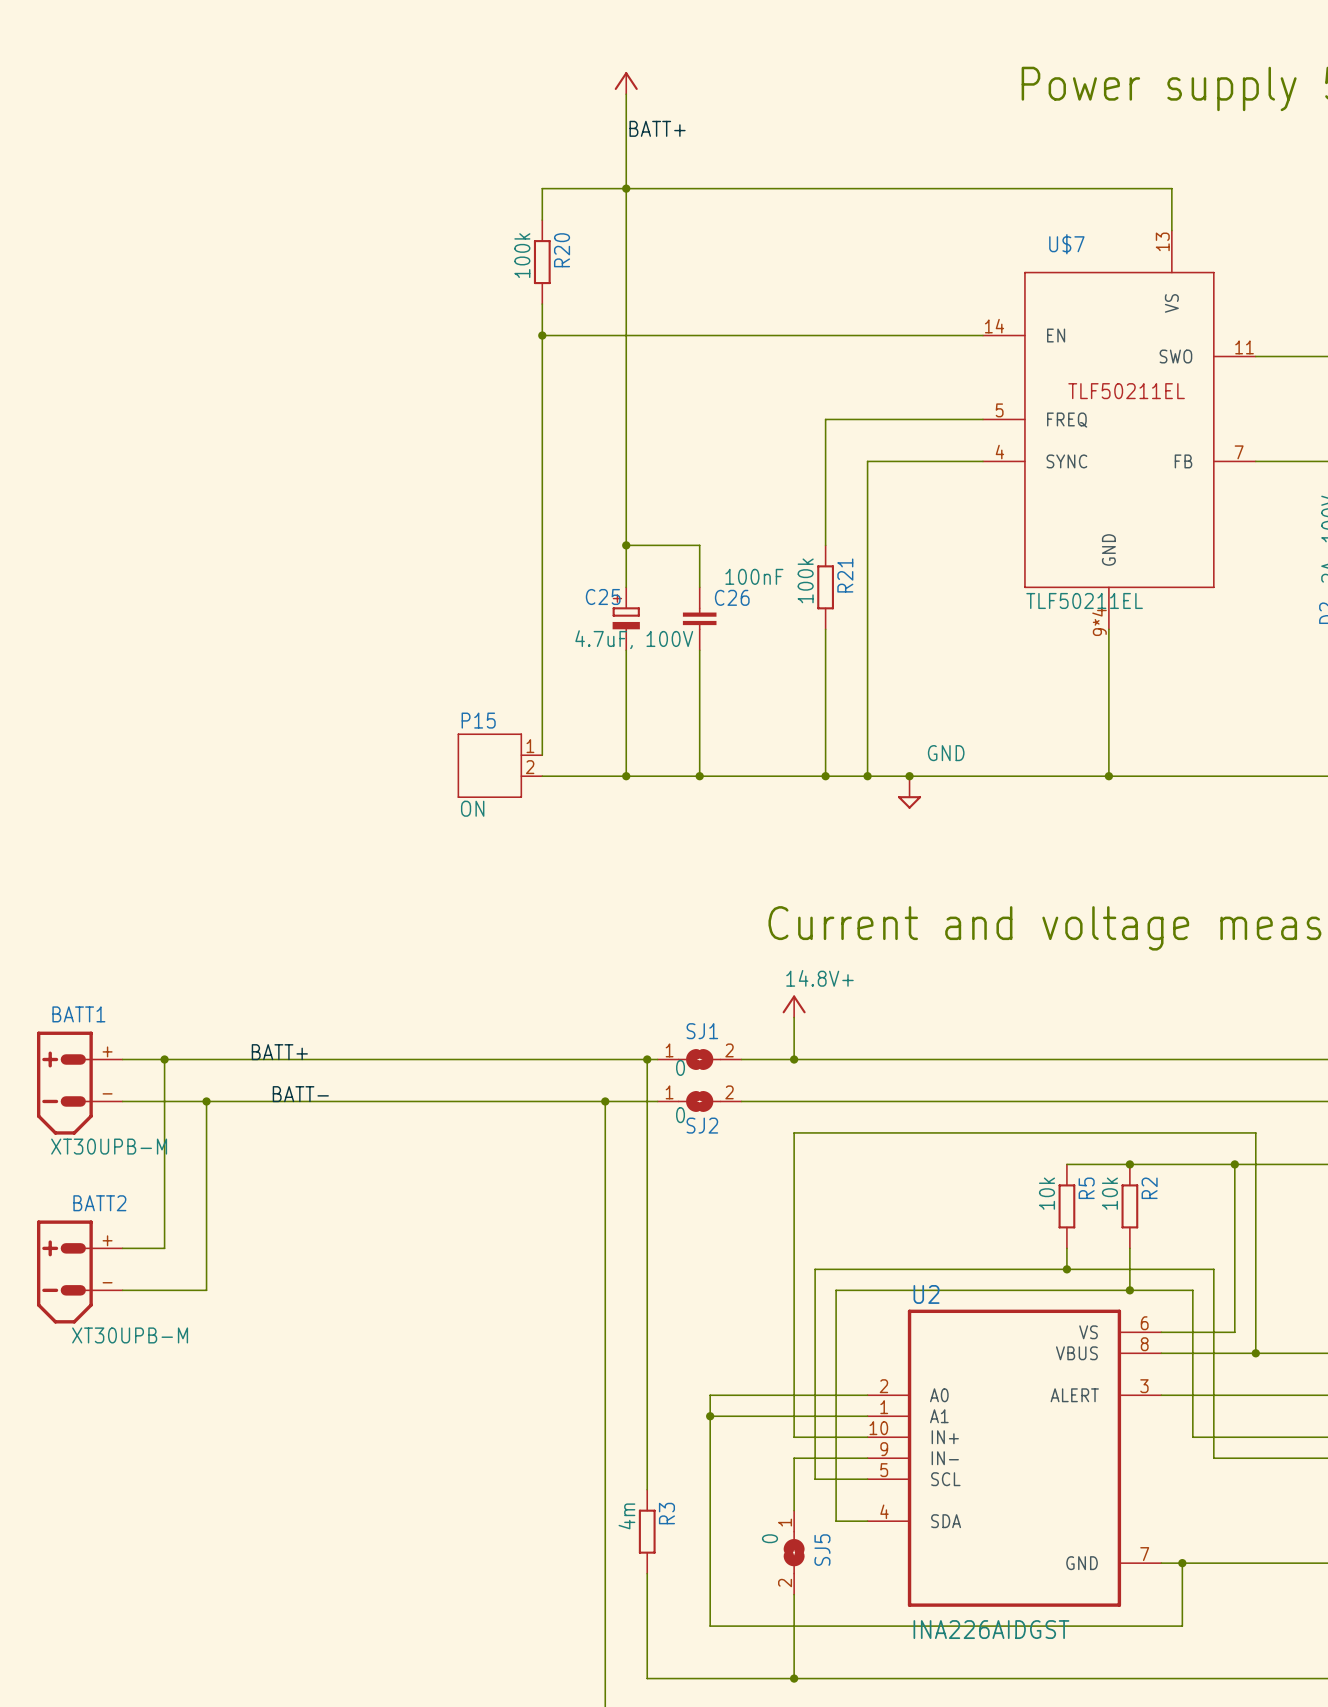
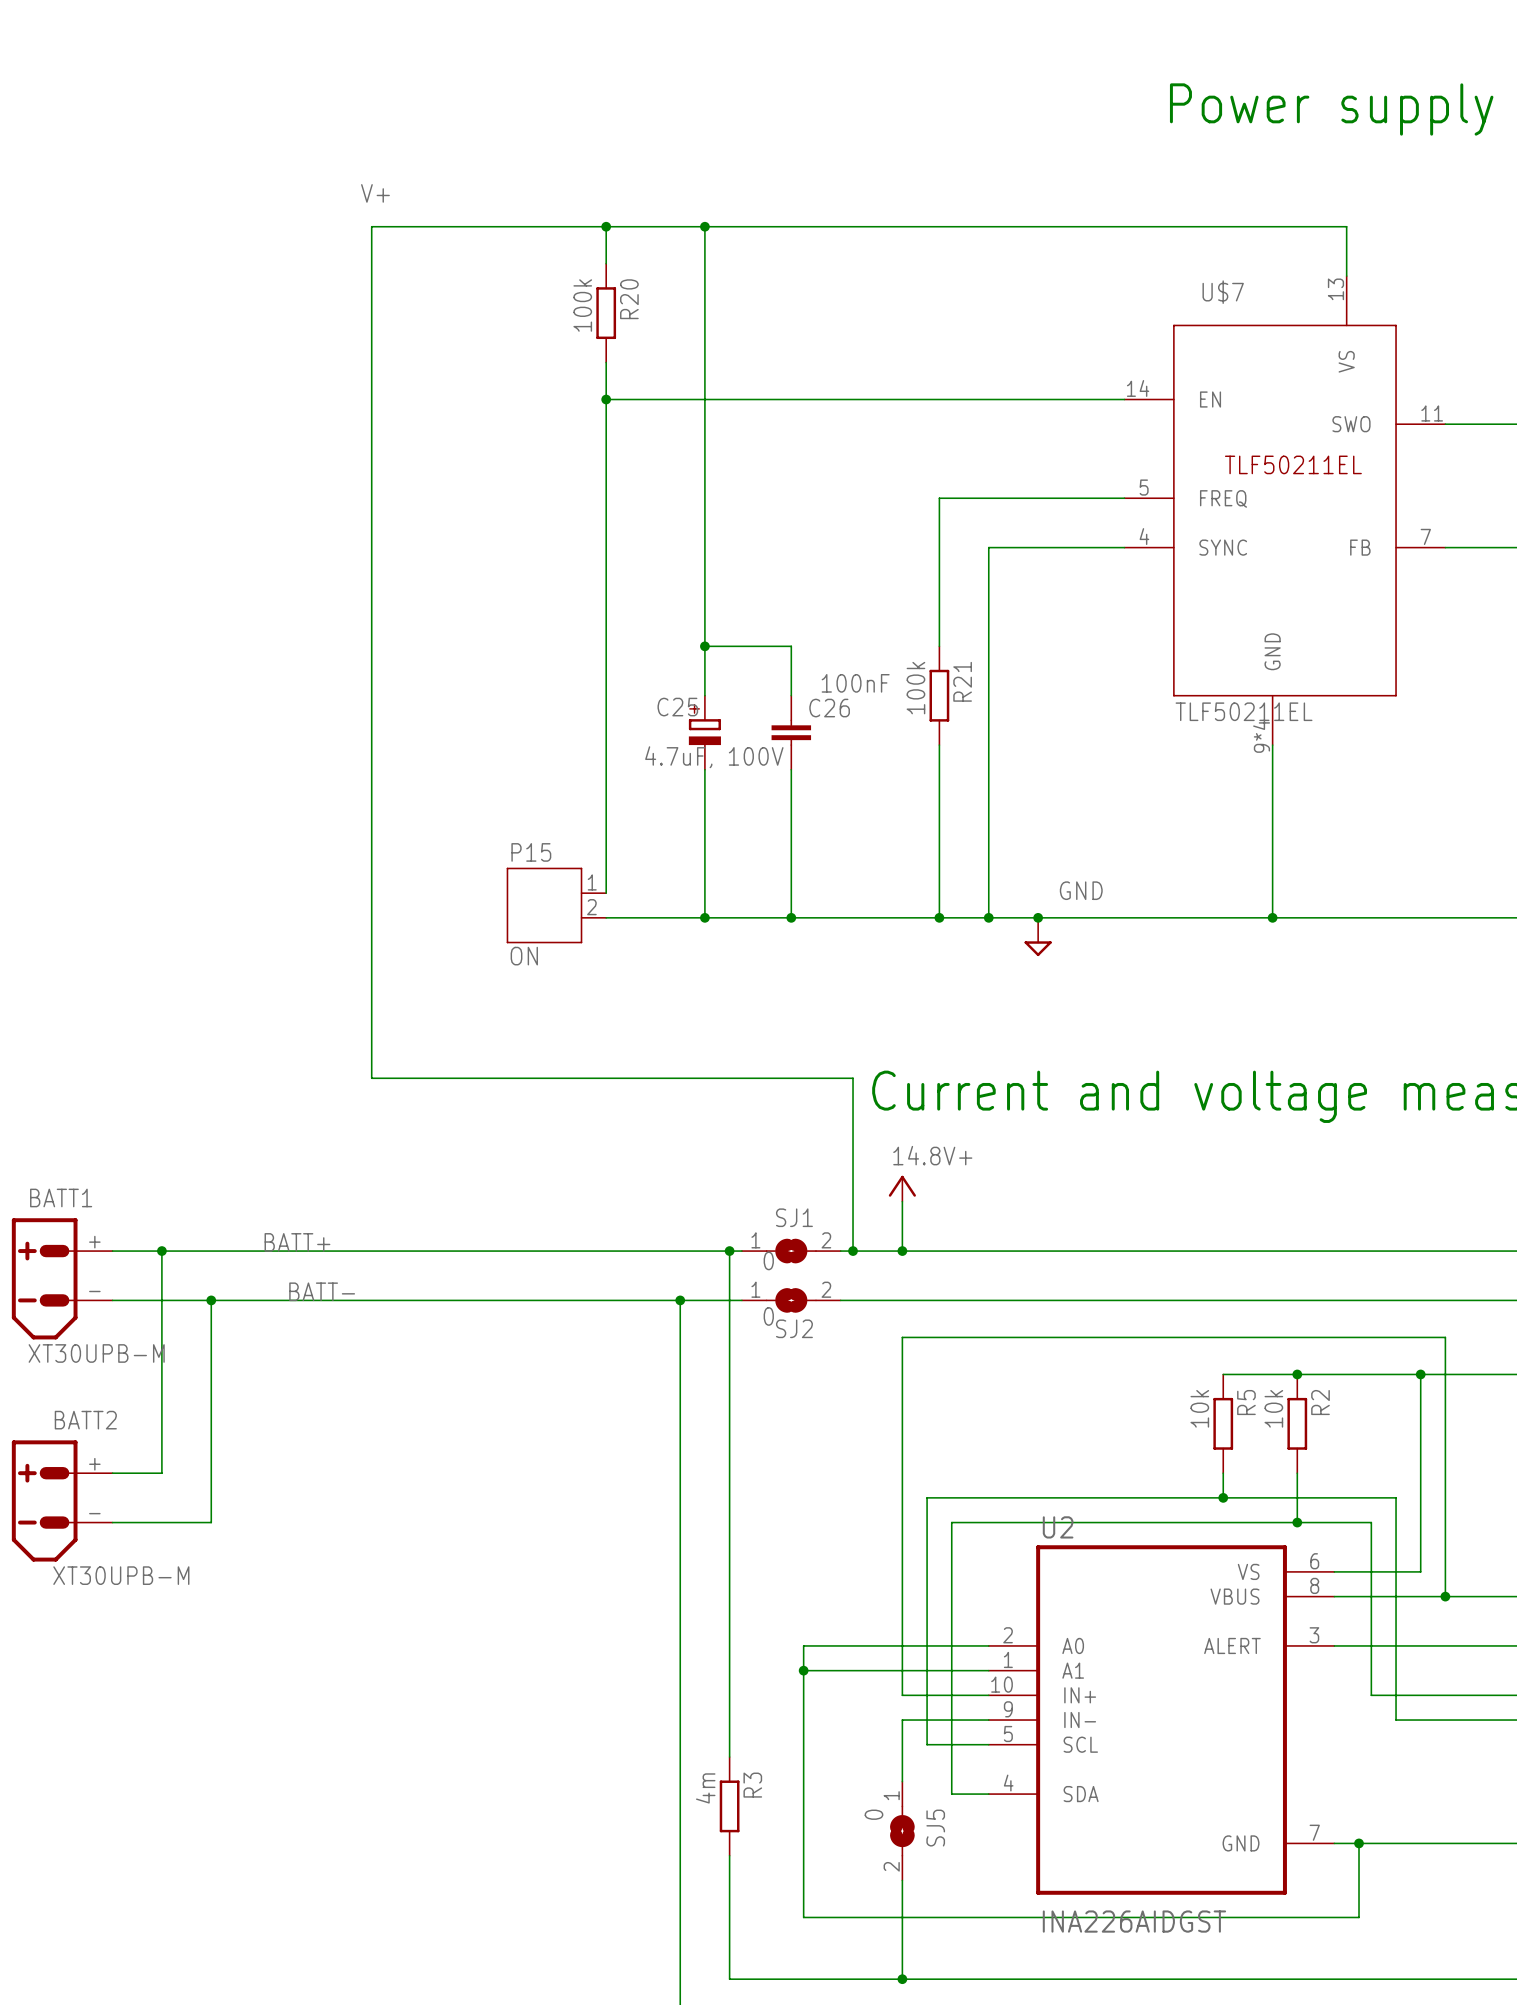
power symbol: (626, 83) -> none
wire: (626, 94) (626, 188) -> none
label: BATT+ (657, 128) -> none
label: none -> V+ (375, 193)
wire: none -> (606, 226) (371, 226) (371, 1078) (853, 1078) (853, 1251)
junction: none -> (606, 226)
junction: none -> (853, 1251)

